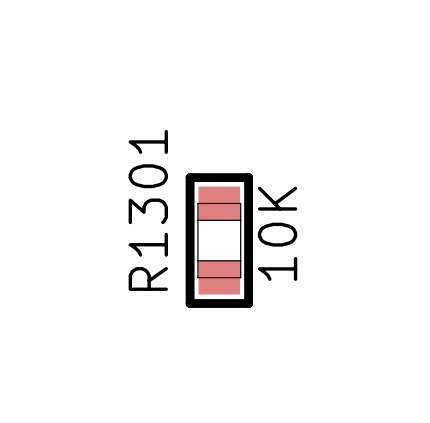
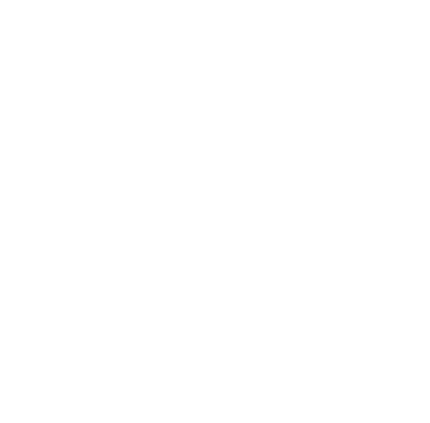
R1301: 10K (219, 240) -> none

